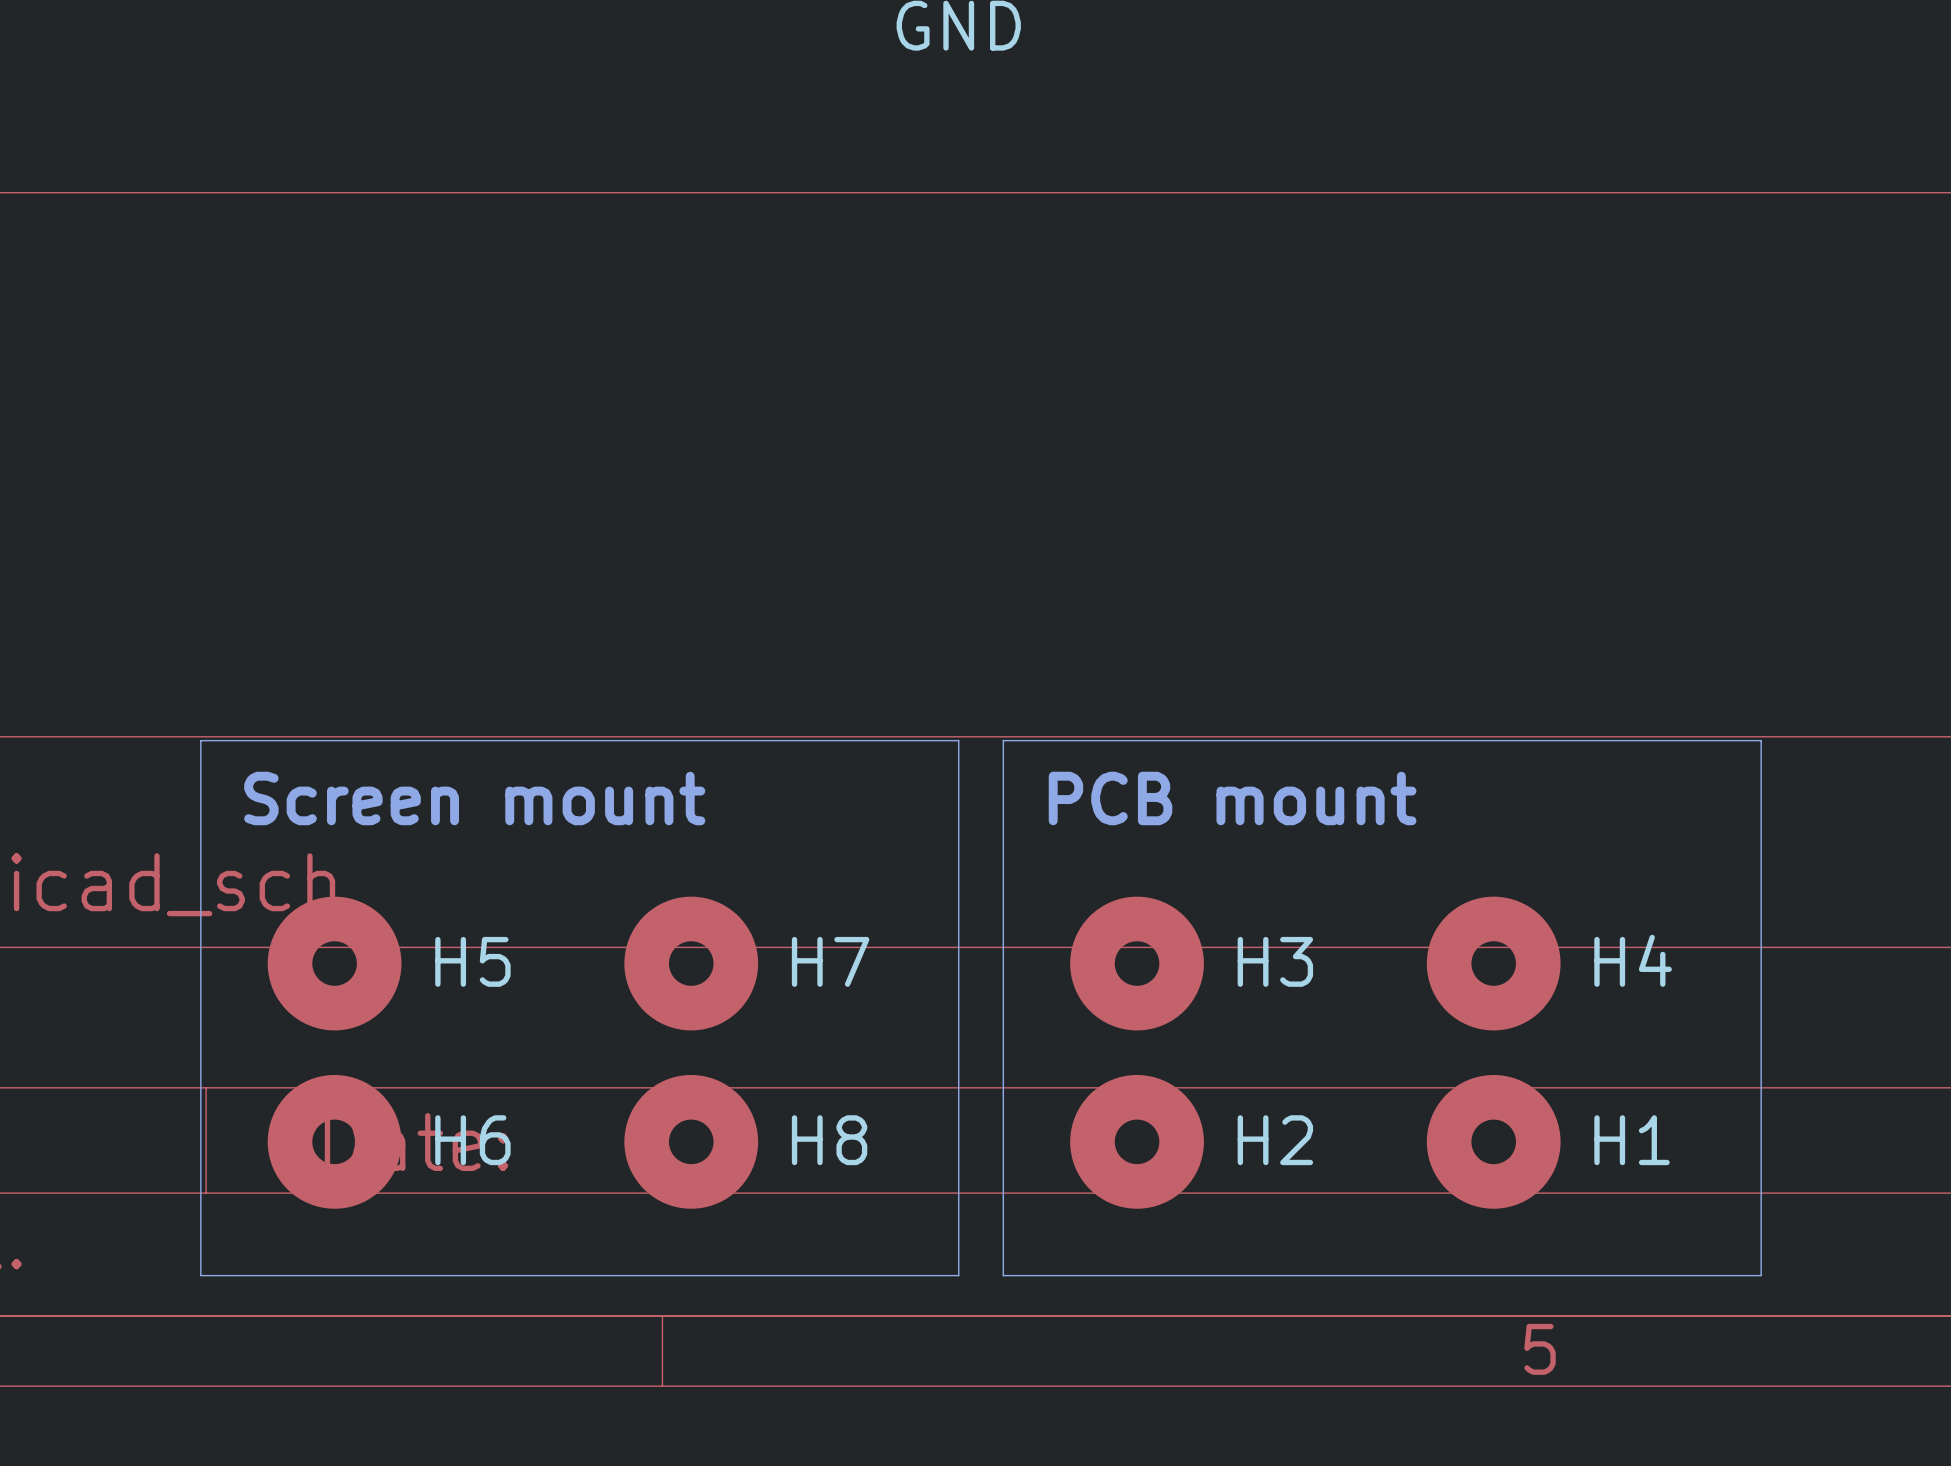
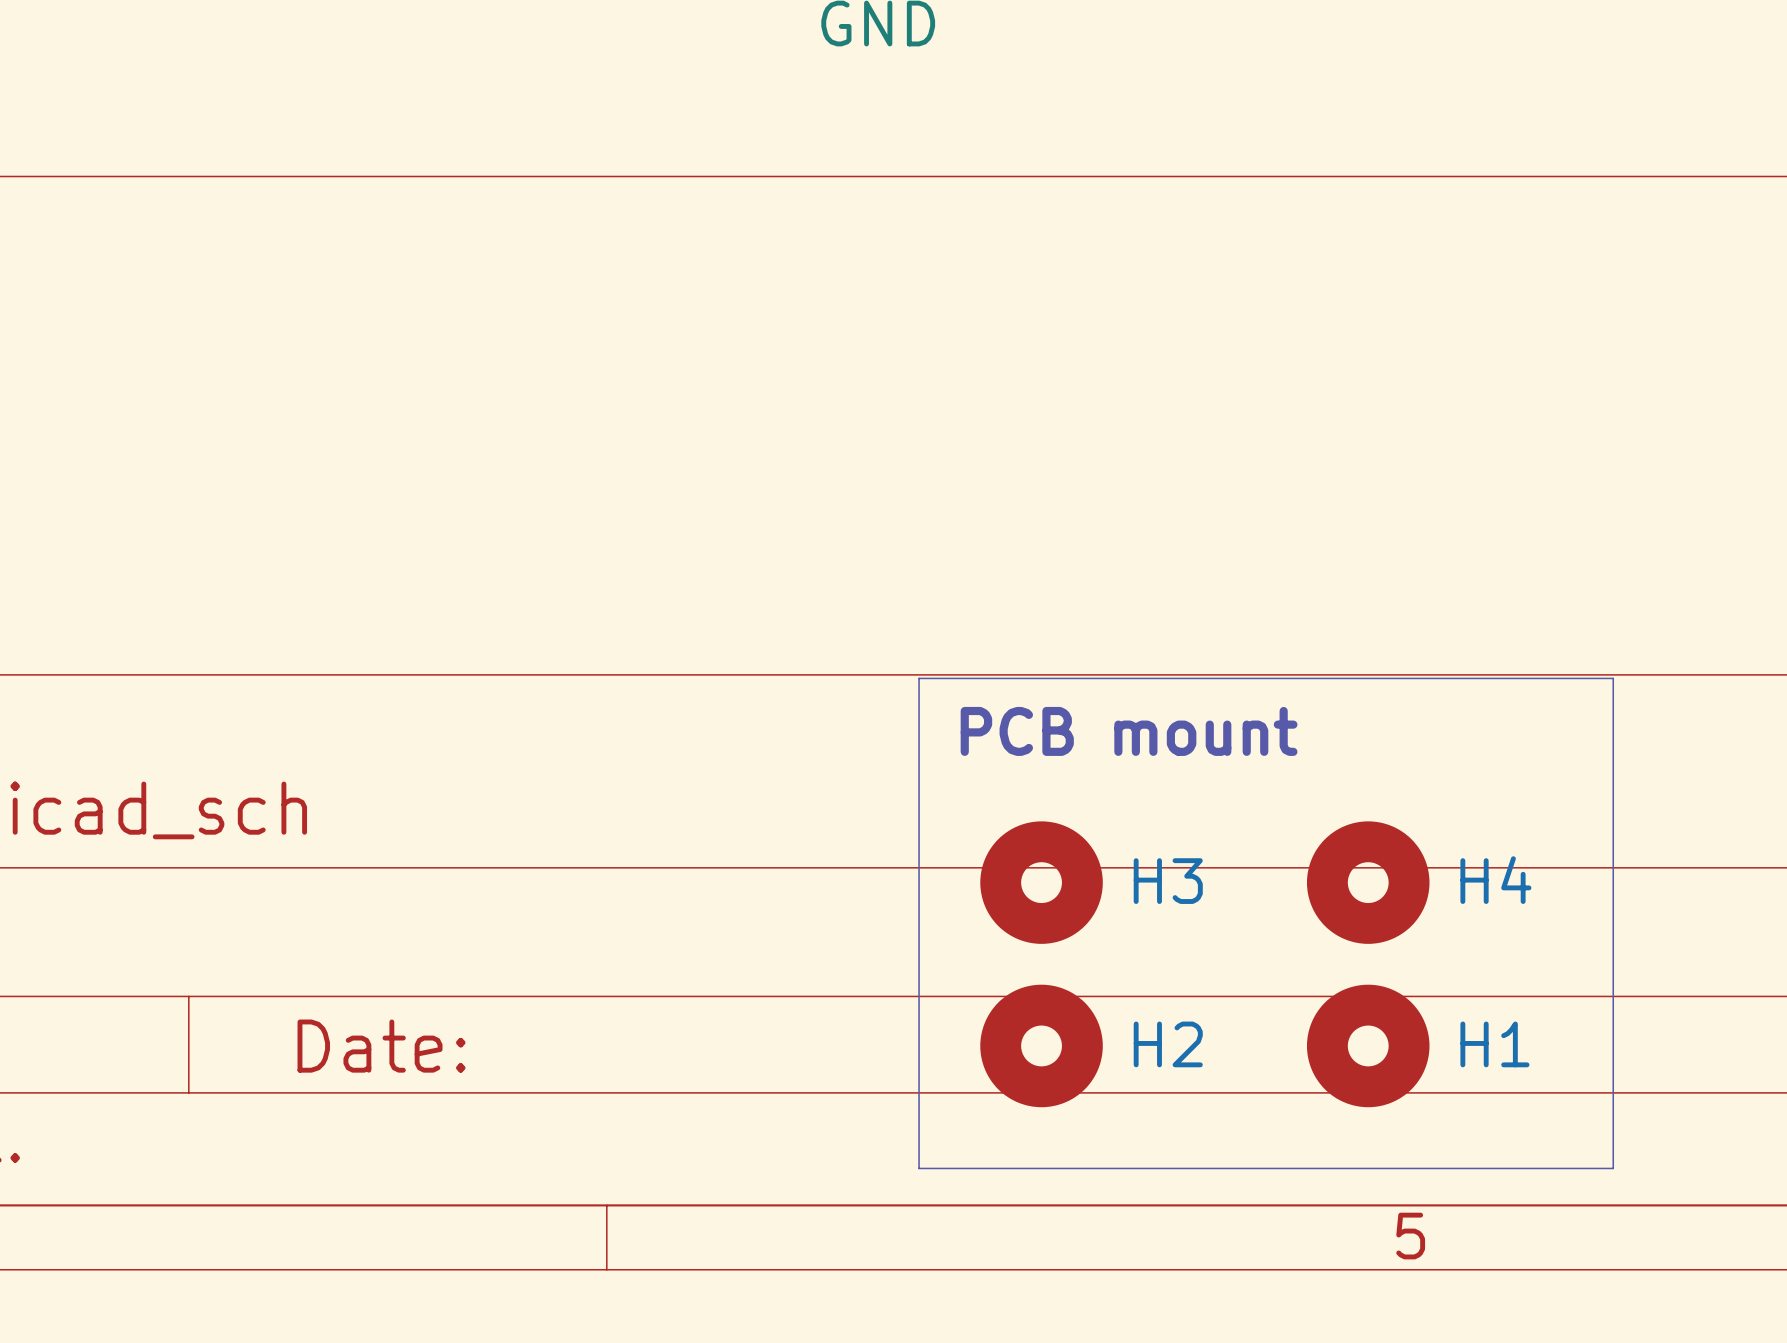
line: (200, 740) (958, 740) (958, 1275) (200, 1275) (200, 740) -> none
text: Screen mount (474, 798) -> none
H5: (334, 963) -> none
H7: (691, 963) -> none
H6: (334, 1141) -> none
H8: (691, 1141) -> none

